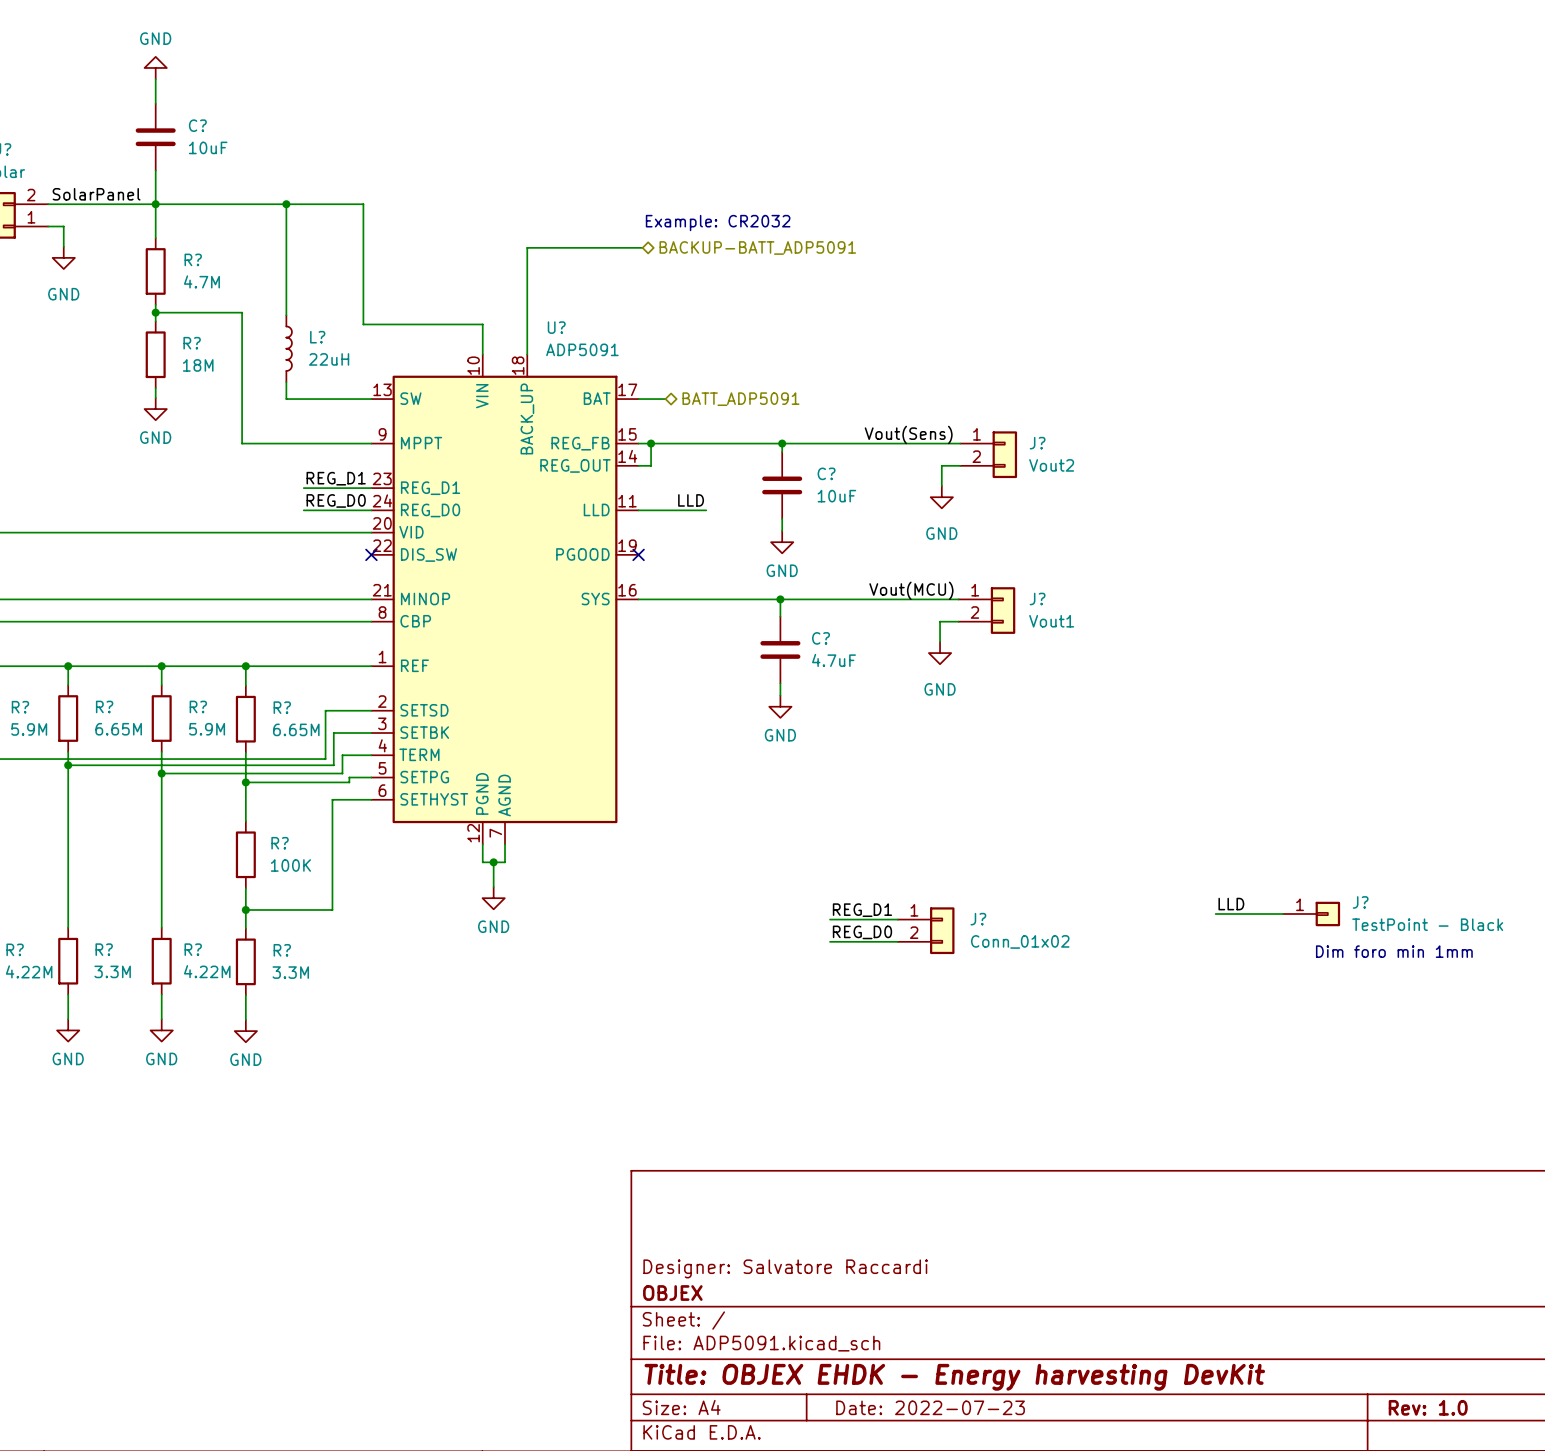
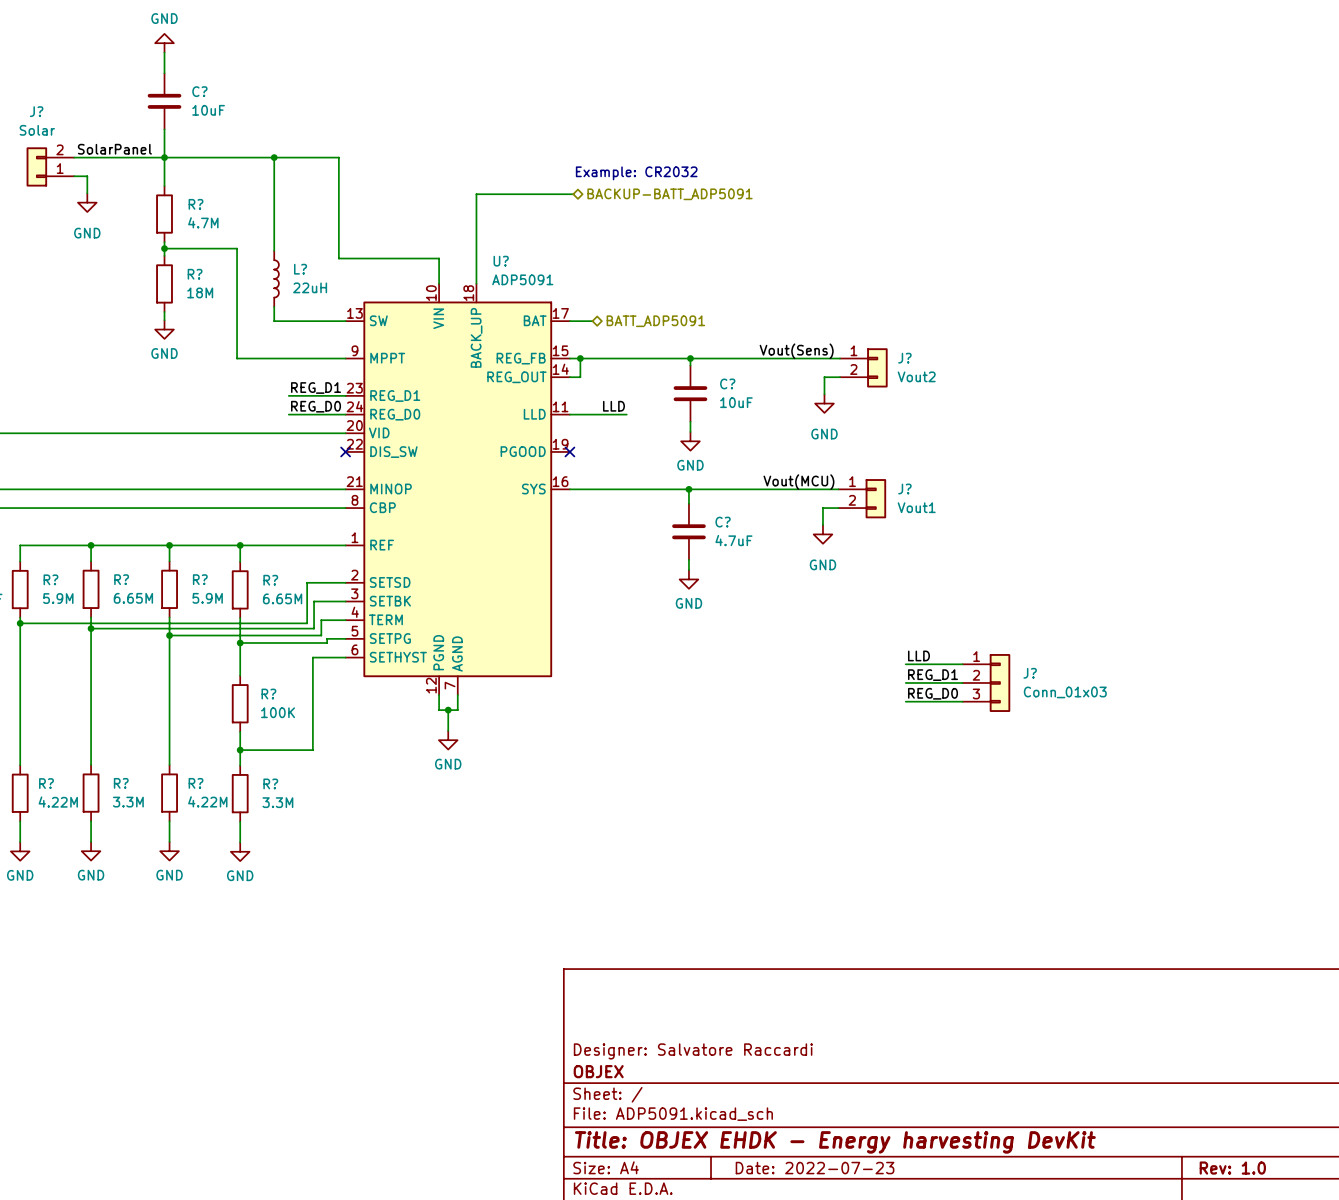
wire: none -> (905, 664) (962, 664)
label: none -> REG_D1 (933, 675)
wire: none -> (905, 682) (962, 682)
J?: none -> Conn_01x03 (986, 682)
label: none -> REG_D0 (933, 693)
label position: LLD (1231, 904) -> LLD (918, 655)
label: REG_D1 (862, 910) -> none
wire: (1215, 914) (1283, 914) -> (905, 701) (962, 701)
J?: TestPoint - Black (1311, 914) -> none
wire: (830, 919) (897, 919) -> none
J?: Conn_01x02 (926, 930) -> none
label: REG_D0 (862, 932) -> none
wire: (830, 941) (897, 941) -> none
text: Dim foro min 1mm (1394, 951) -> none

